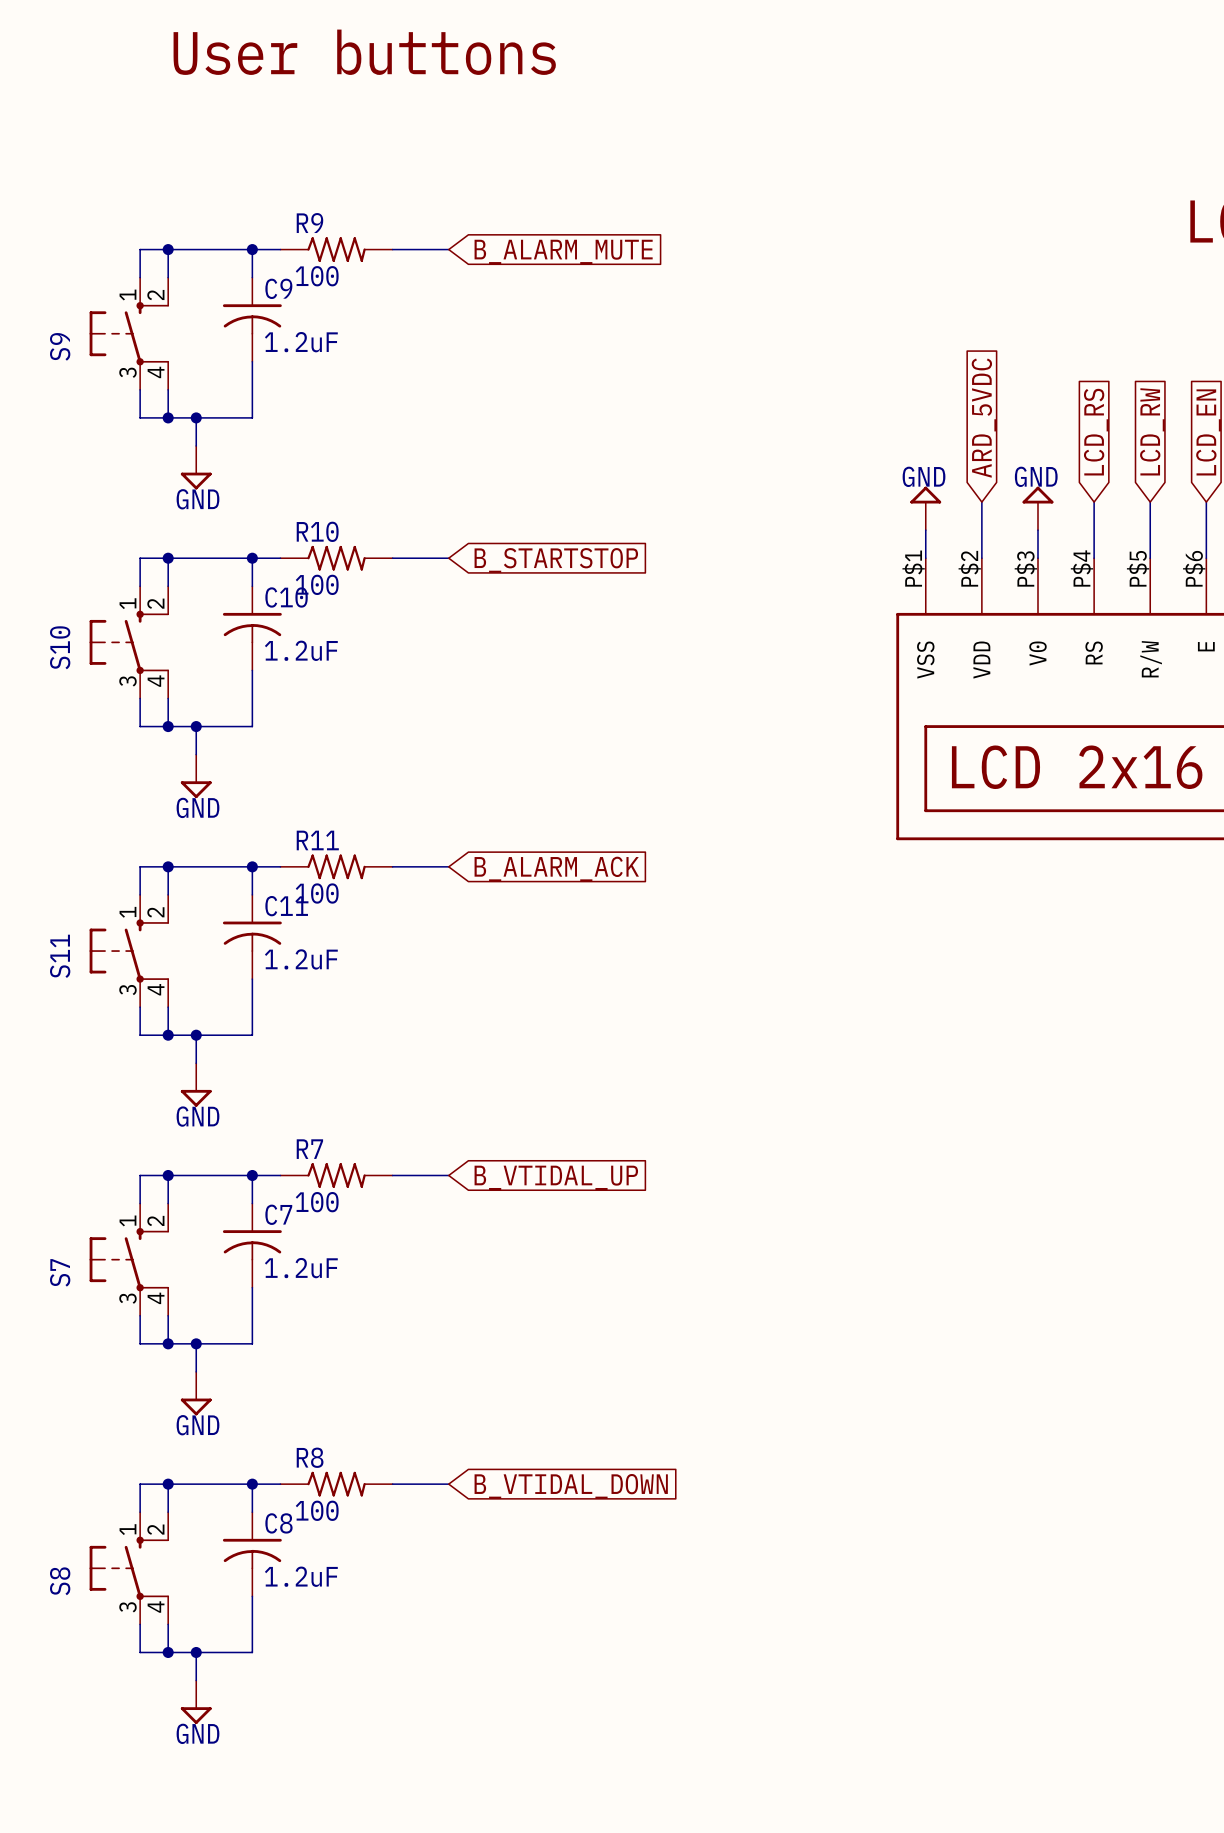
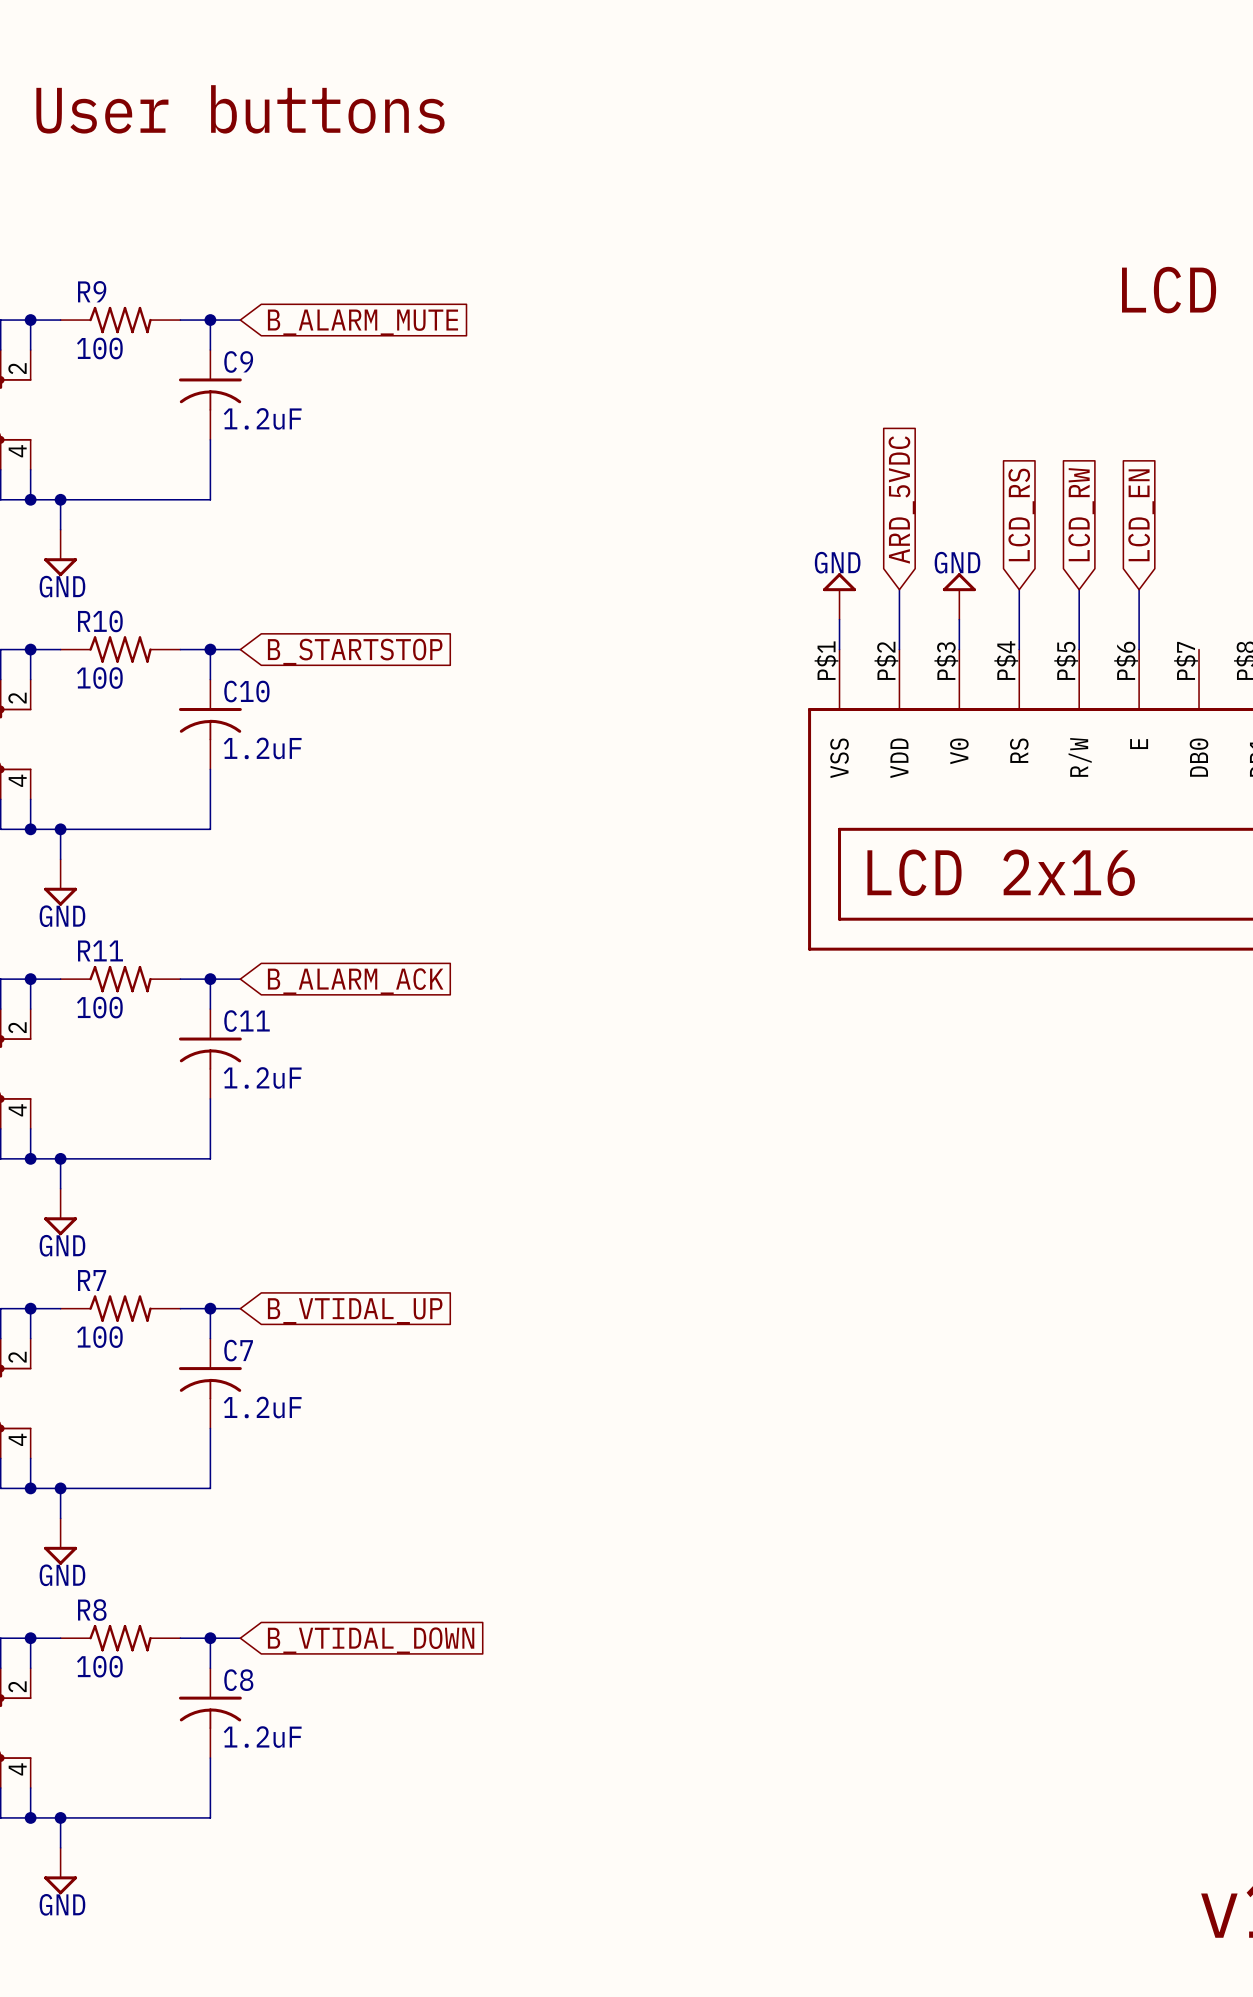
wire: (252, 249) (252, 277) -> (210, 320) (210, 349)
junction: (252, 249) -> none
R9 position: (336, 249) -> (120, 320)
junction: none -> (210, 320)
wire: (392, 249) (448, 249) -> (180, 320) (240, 320)
global label position: B_ALARM_MUTE (563, 251) -> B_ALARM_MUTE (362, 322)
C9 position: (252, 319) -> (210, 394)
wire: (252, 361) (252, 417) -> (210, 439) (210, 499) (120, 499)
wire: (252, 558) (252, 586) -> (210, 649) (210, 679)
junction: (252, 558) -> none
R10 position: (336, 558) -> (120, 649)
junction: none -> (210, 649)
wire: (392, 558) (448, 558) -> (180, 649) (240, 649)
global label position: B_STARTSTOP (556, 560) -> B_STARTSTOP (355, 651)
C10 position: (252, 628) -> (210, 724)
wire: (252, 670) (252, 726) -> (210, 769) (210, 829) (120, 829)
wire: (252, 866) (252, 894) -> (210, 979) (210, 1009)
junction: (252, 866) -> none
R11 position: (336, 866) -> (120, 979)
junction: none -> (210, 979)
wire: (392, 866) (448, 866) -> (180, 979) (240, 979)
global label position: B_ALARM_ACK (556, 869) -> B_ALARM_ACK (355, 981)
C11 position: (252, 937) -> (210, 1054)
wire: (252, 979) (252, 1035) -> (210, 1098) (210, 1158) (120, 1158)
wire: (252, 1175) (252, 1203) -> (210, 1308) (210, 1338)
junction: (252, 1175) -> none
R7 position: (336, 1175) -> (120, 1308)
junction: none -> (210, 1308)
wire: (392, 1175) (448, 1175) -> (180, 1308) (240, 1308)
global label position: B_VTIDAL_UP (556, 1177) -> B_VTIDAL_UP (355, 1311)
C7 position: (252, 1245) -> (210, 1383)
wire: (252, 1287) (252, 1343) -> (210, 1428) (210, 1488) (120, 1488)
wire: (252, 1484) (252, 1512) -> (210, 1638) (210, 1668)
junction: (252, 1484) -> none
R8 position: (336, 1484) -> (120, 1638)
junction: none -> (210, 1638)
wire: (392, 1484) (448, 1484) -> (180, 1638) (240, 1638)
global label position: B_VTIDAL_DOWN (571, 1486) -> B_VTIDAL_DOWN (371, 1640)
C8 position: (252, 1554) -> (210, 1713)
wire: (252, 1596) (252, 1652) -> (210, 1758) (210, 1817) (120, 1817)

